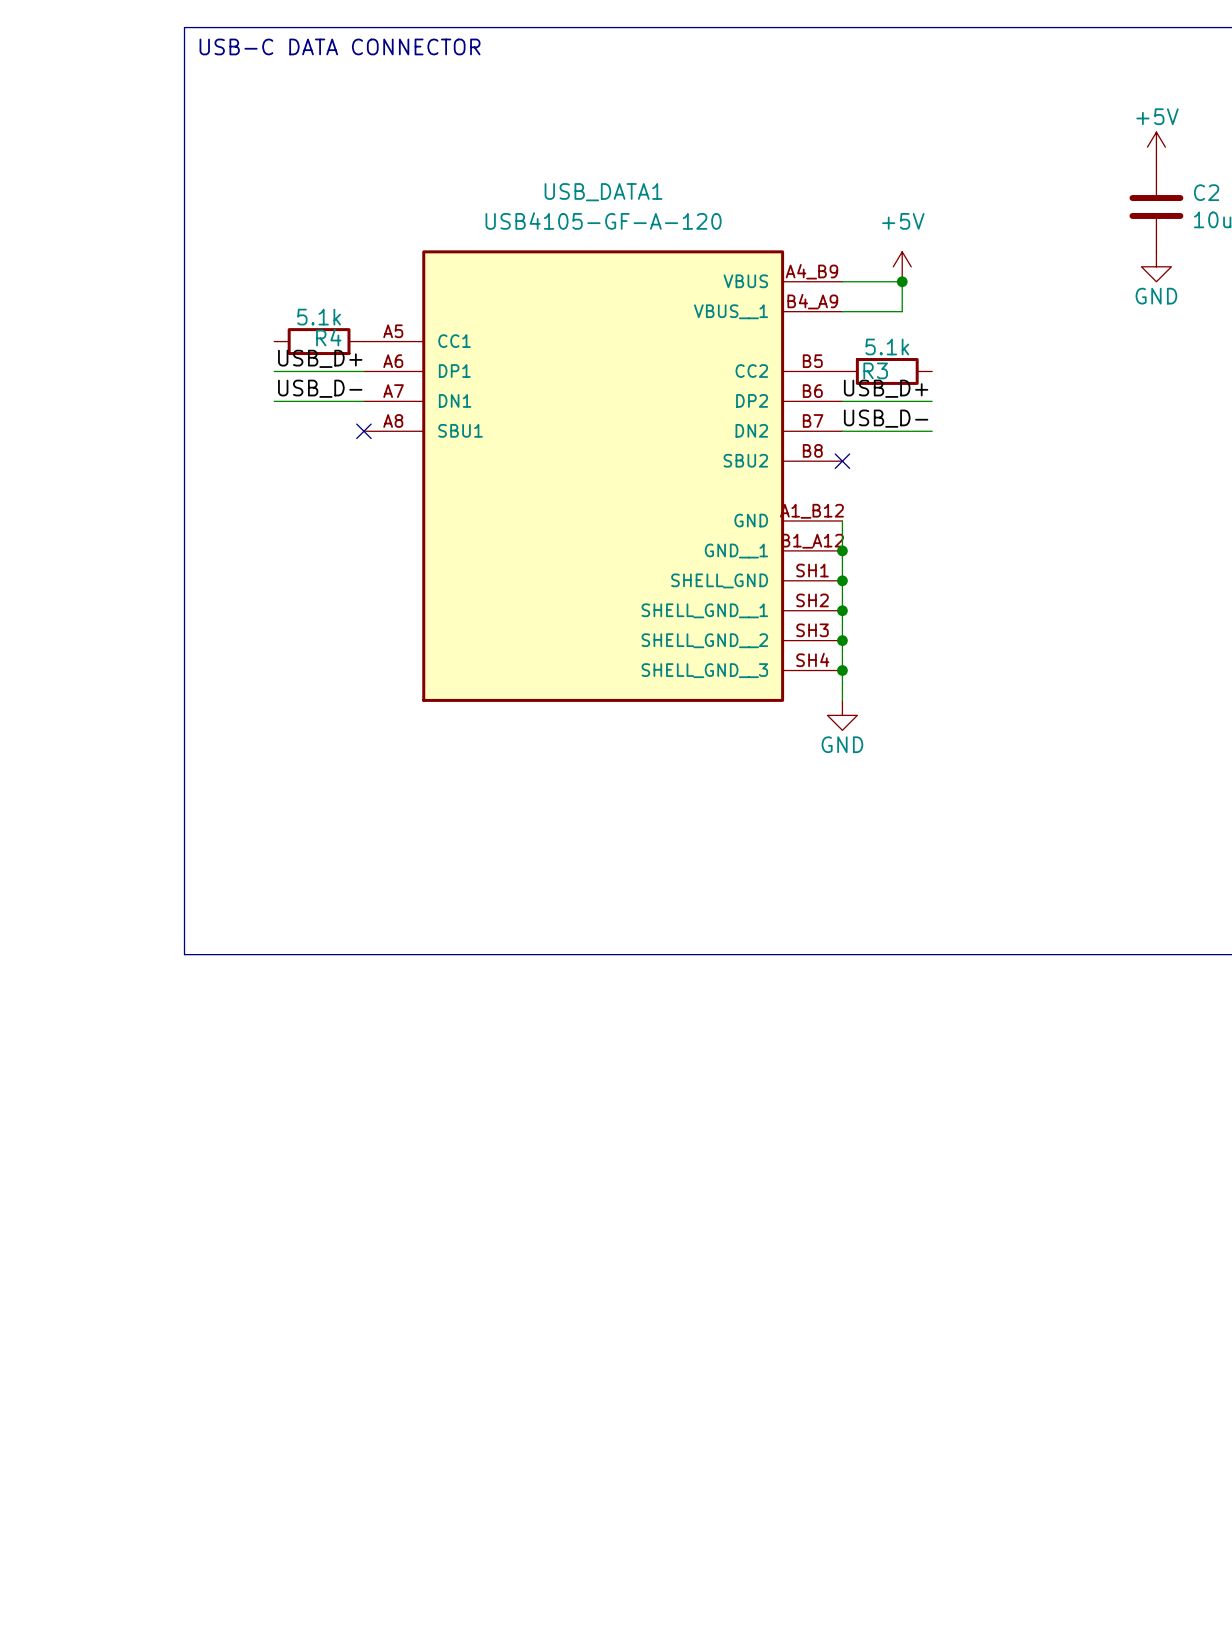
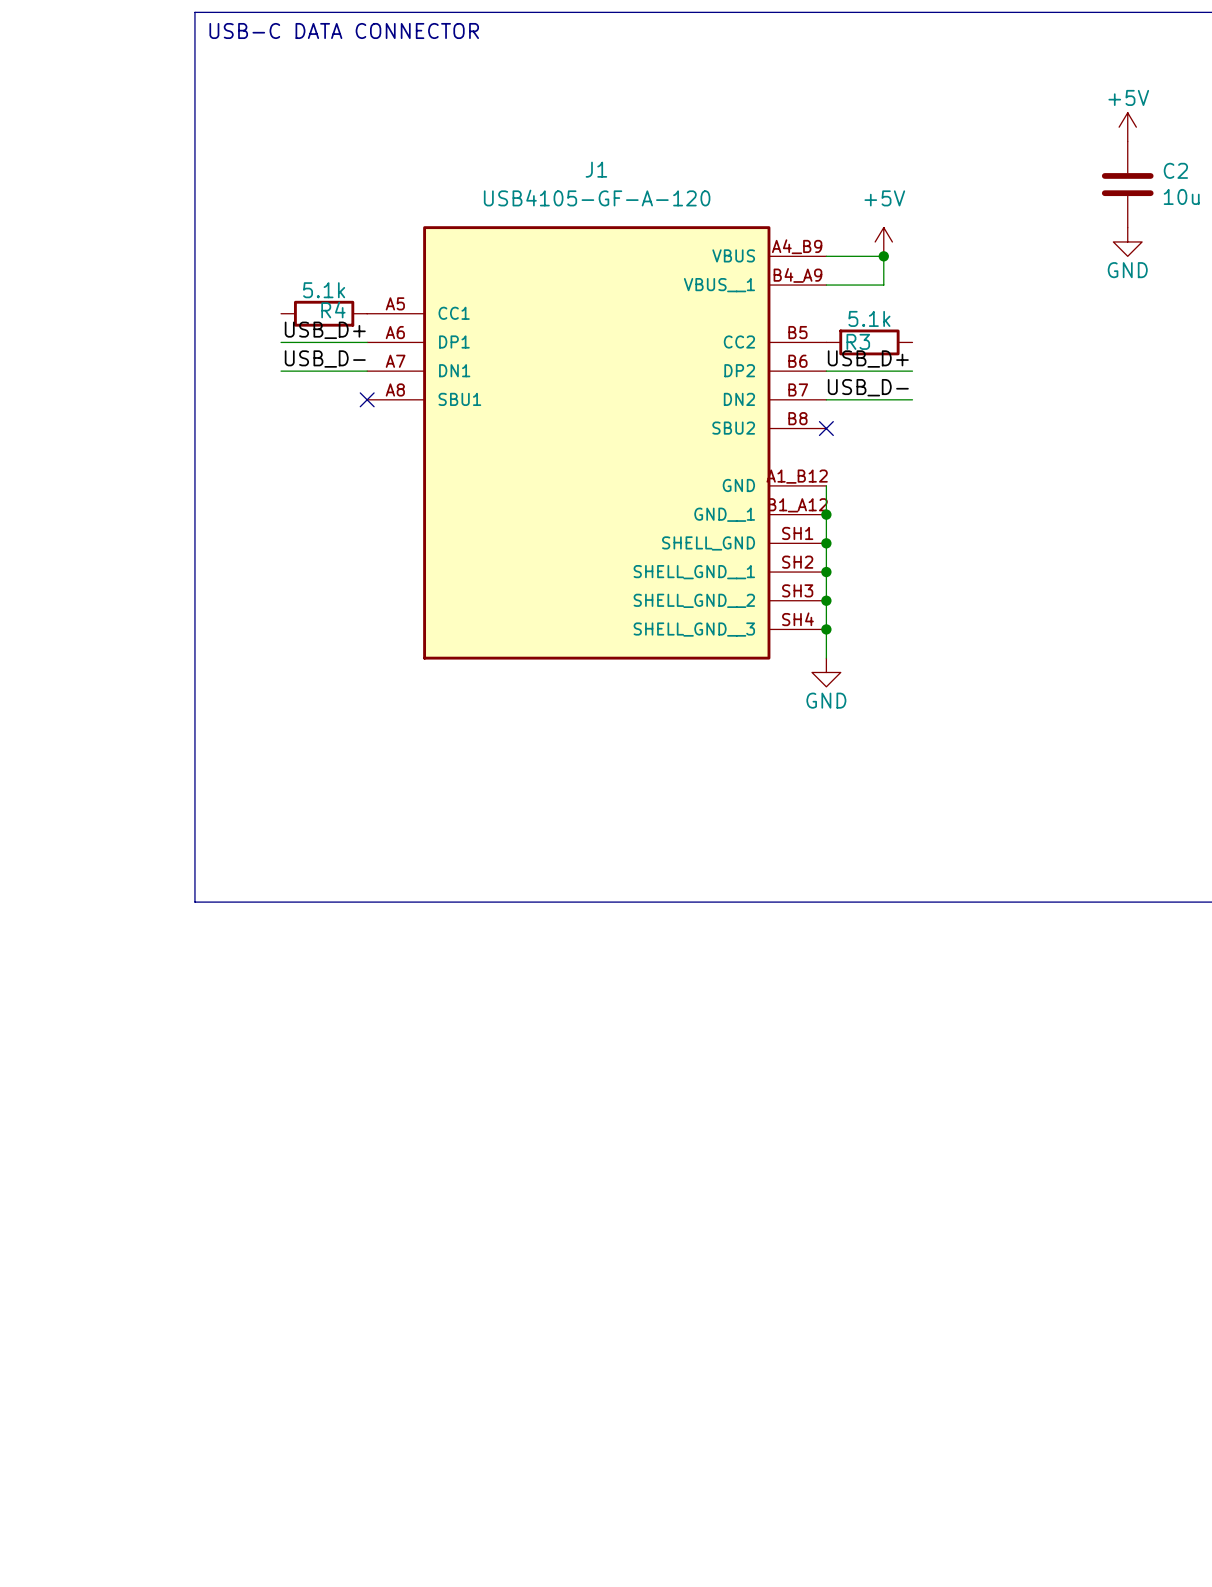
USB_DATA1 name: USB_DATA1 (603, 192) -> J1 (596, 169)

